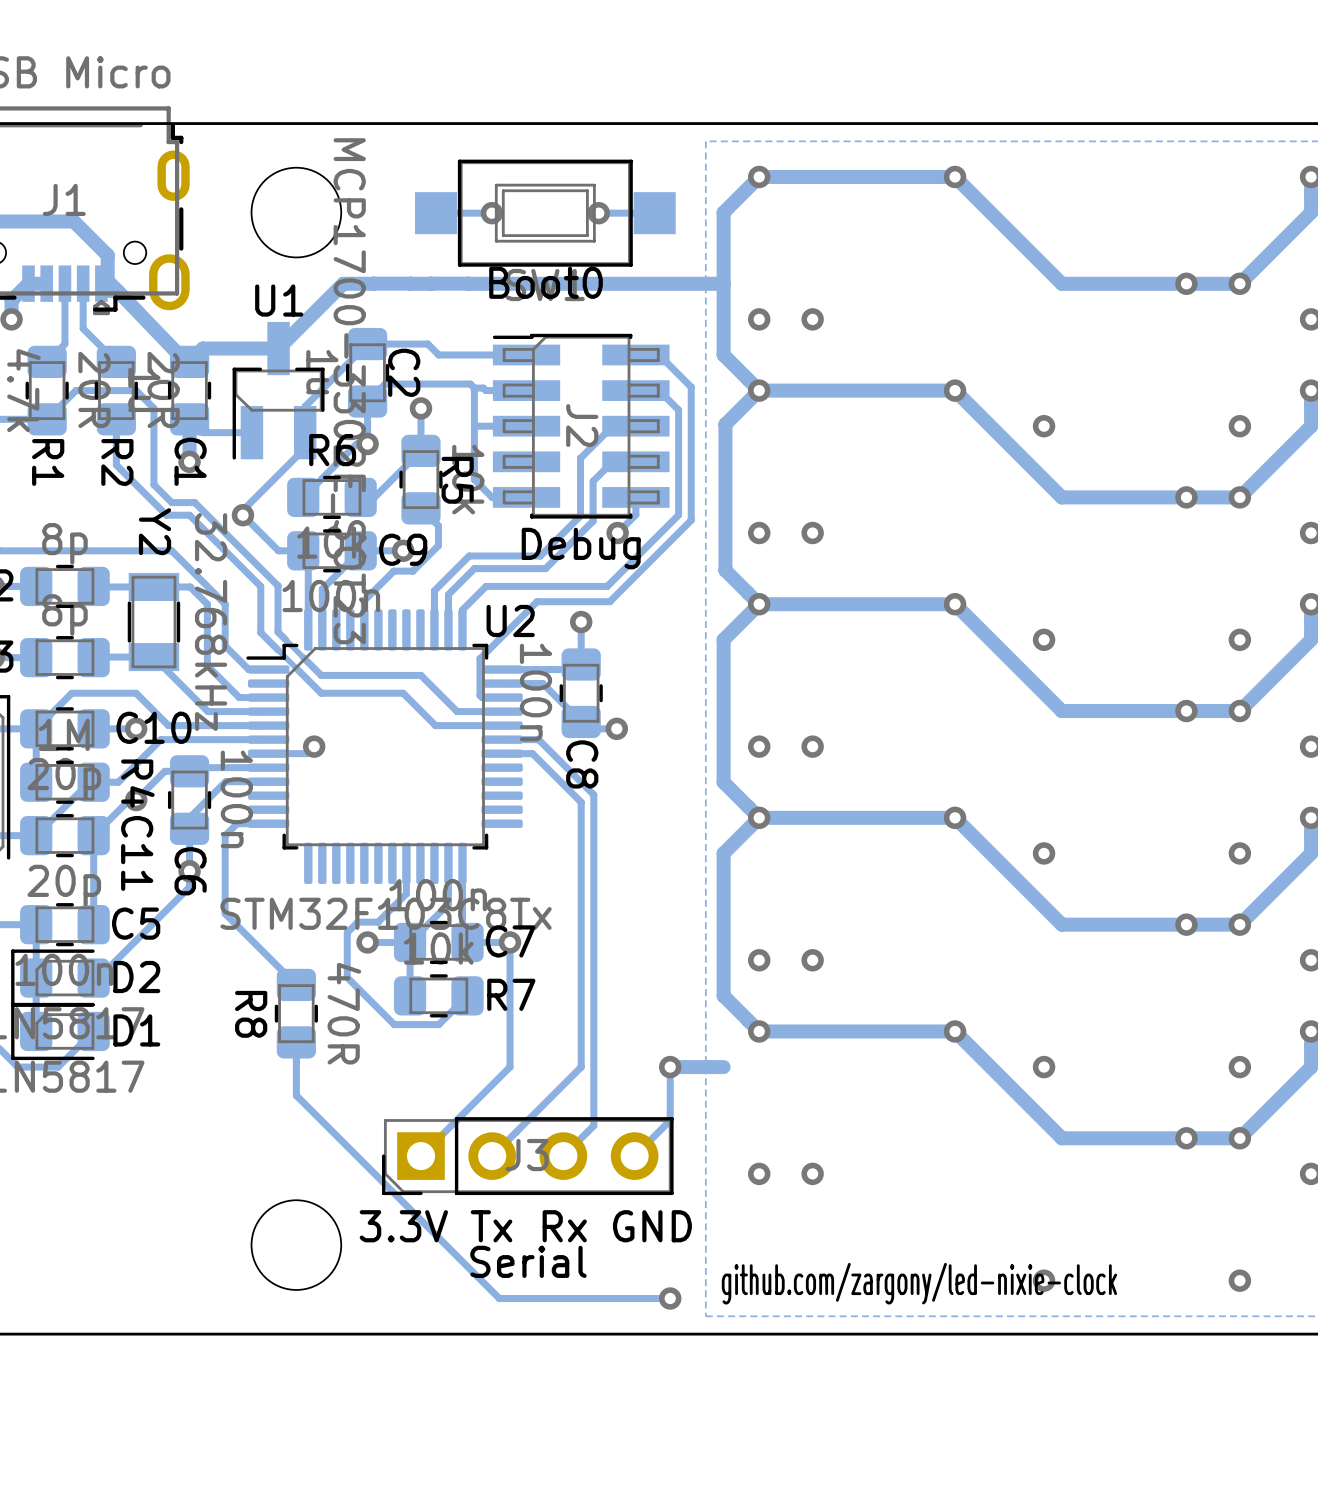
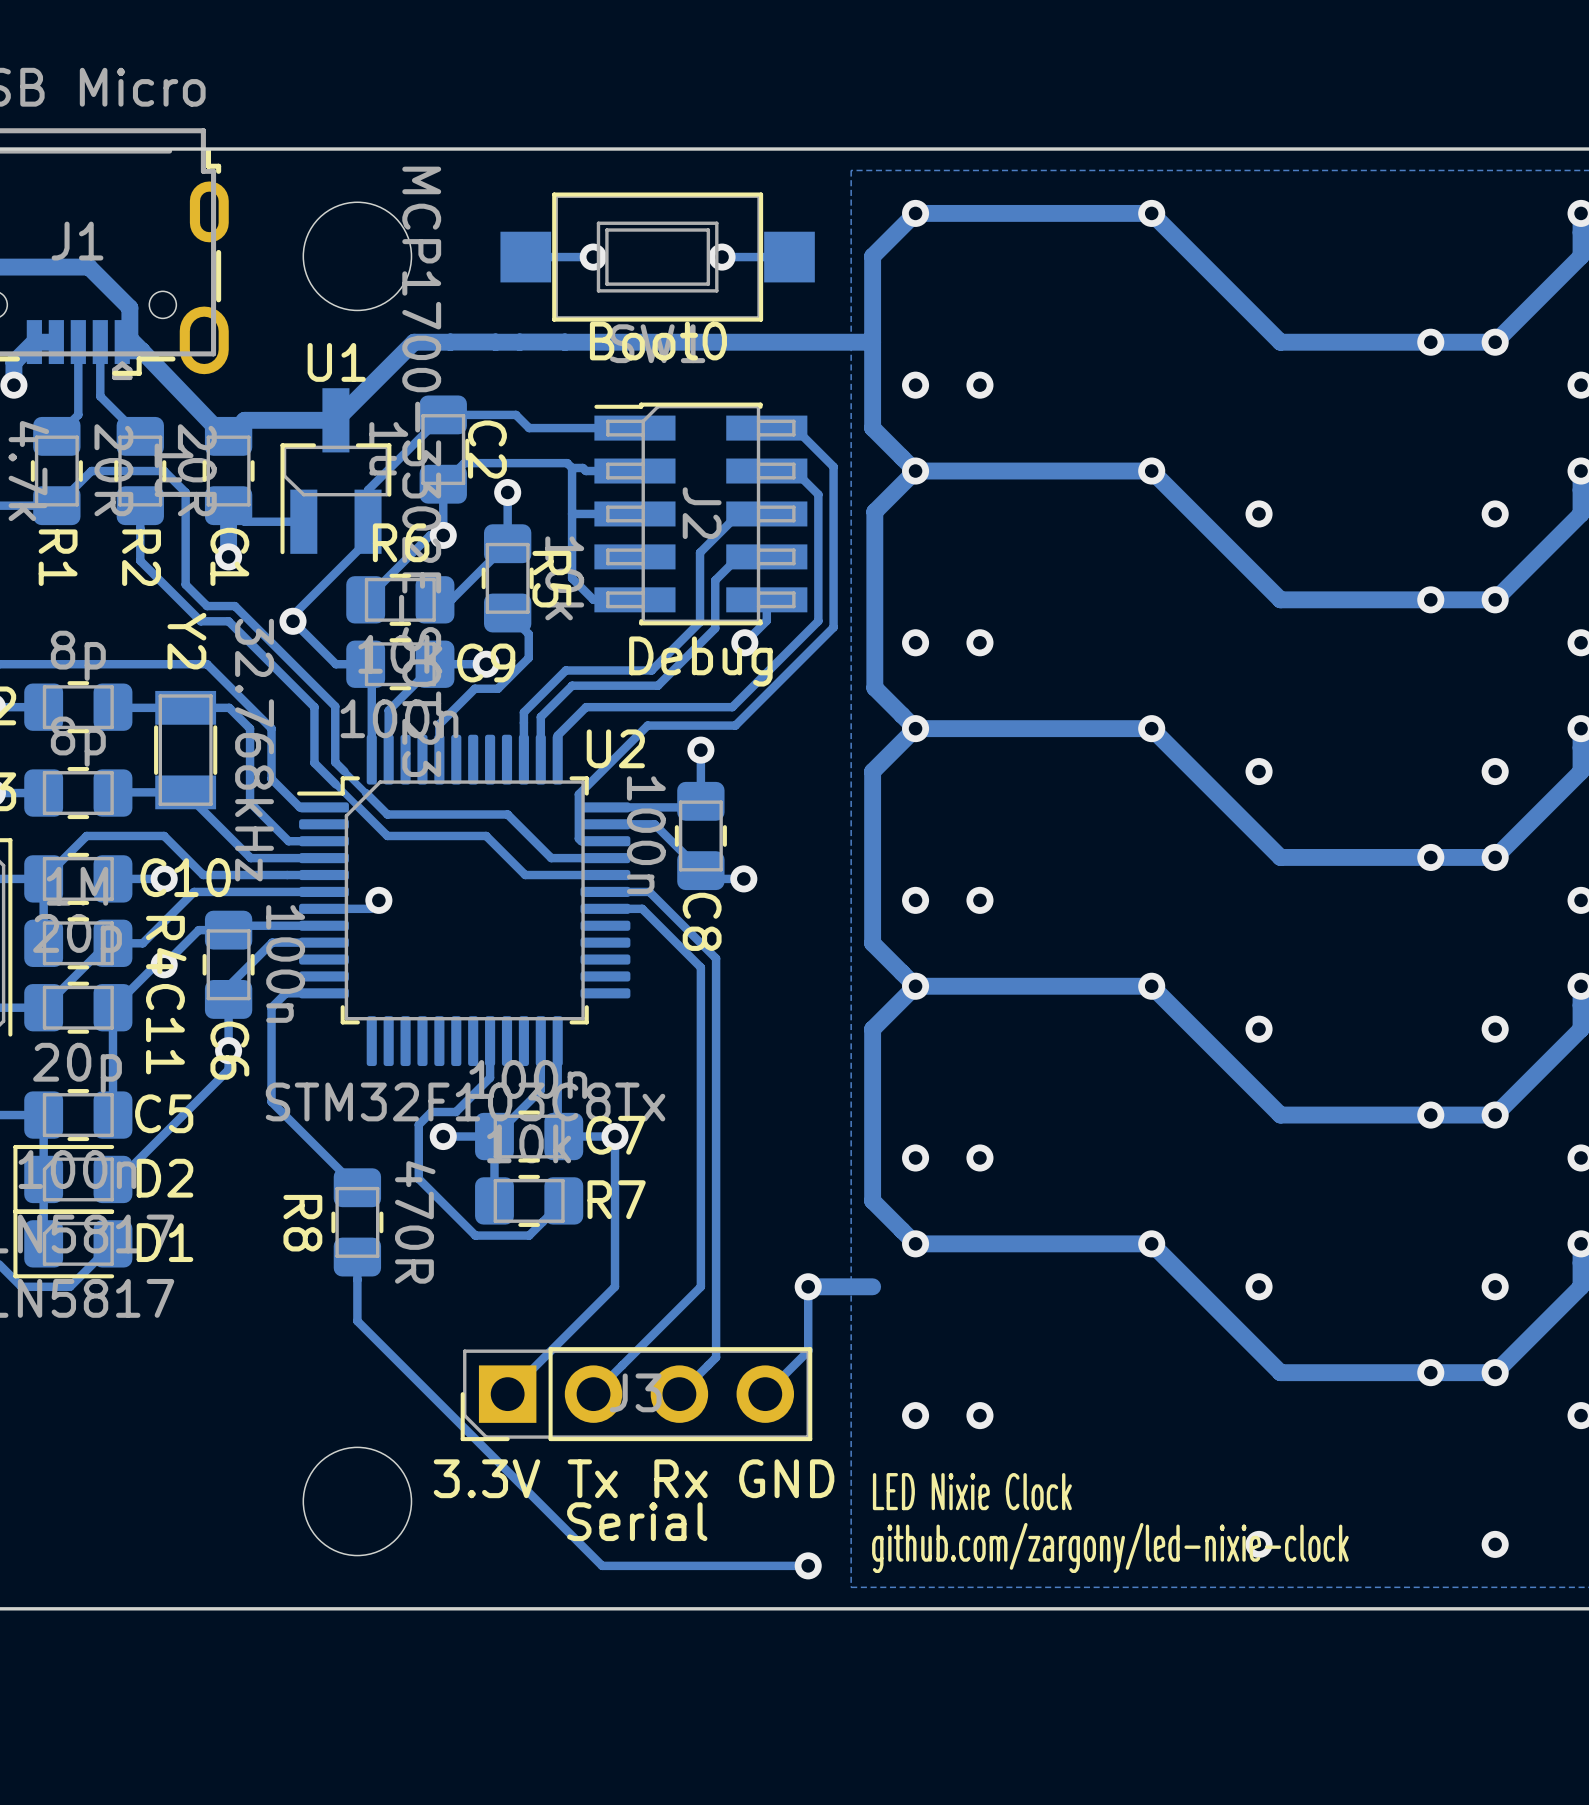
text: none -> LED Nixie Clock (972, 1491)
text position: github.com/zargony/led-nixie-clock (919, 1283) -> github.com/zargony/led-nixie-clock (1110, 1547)

